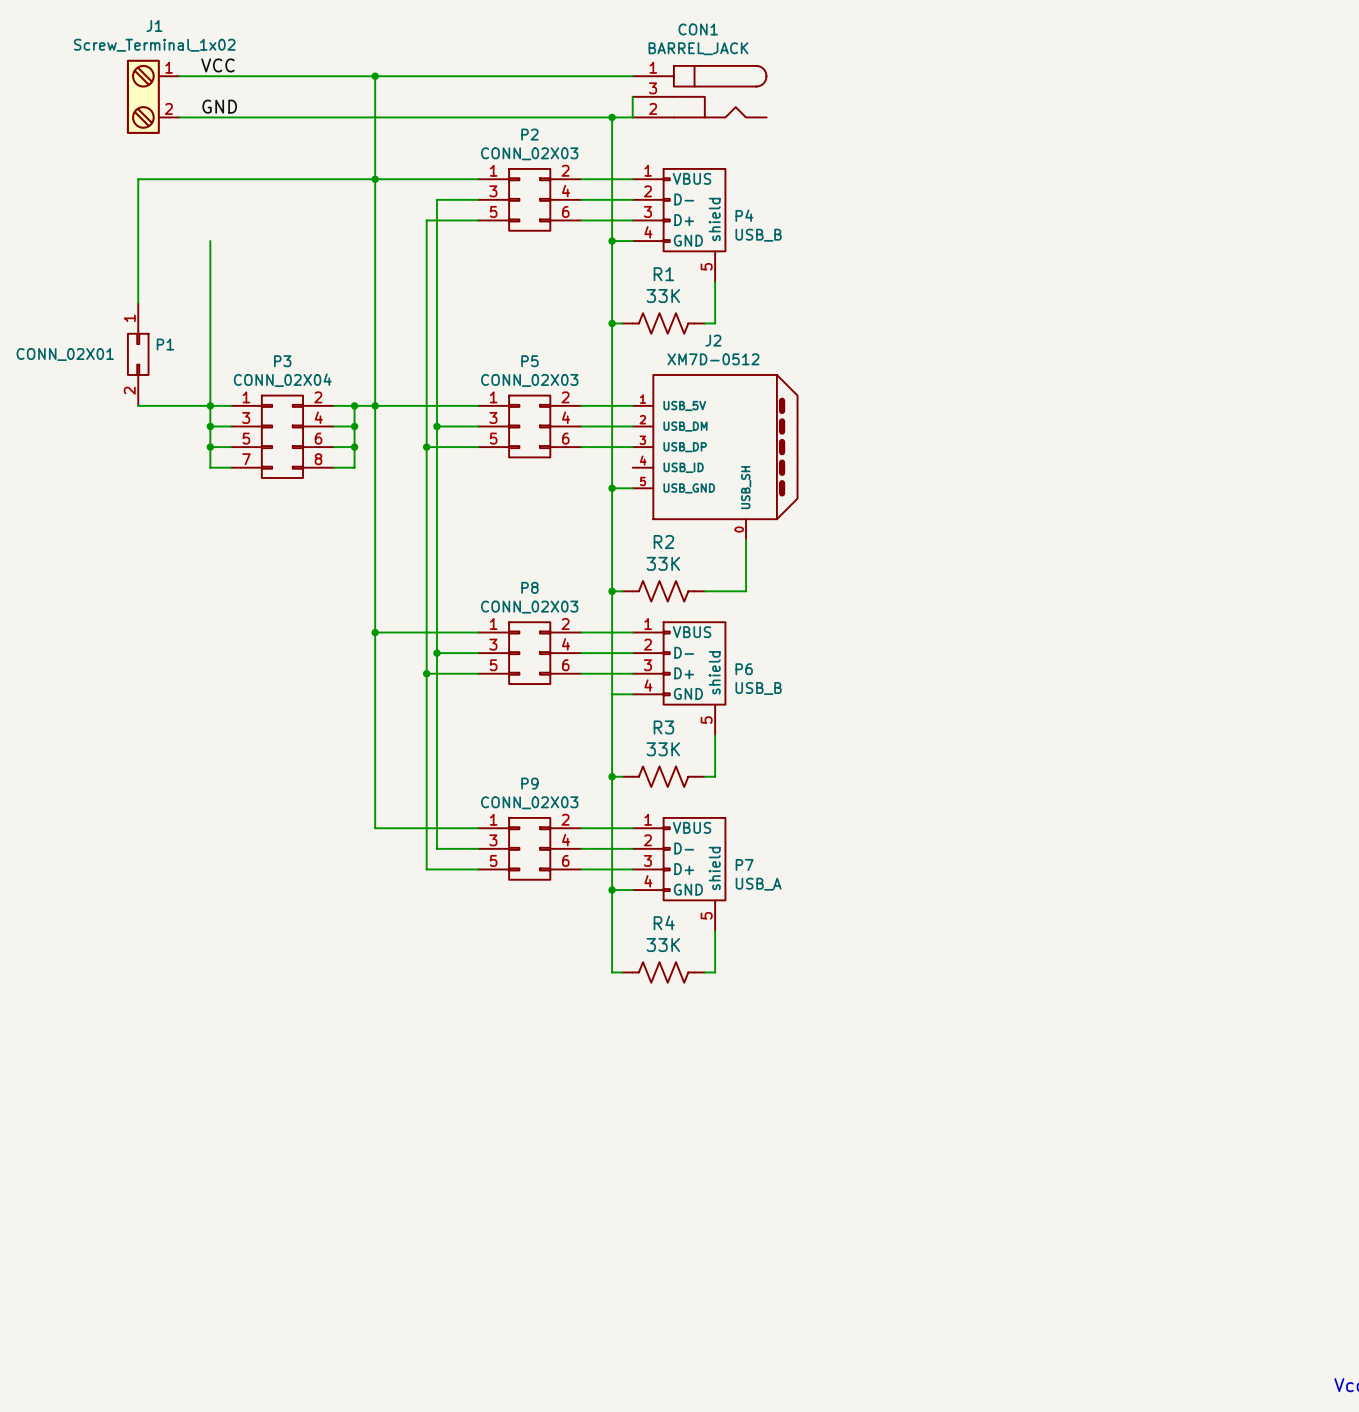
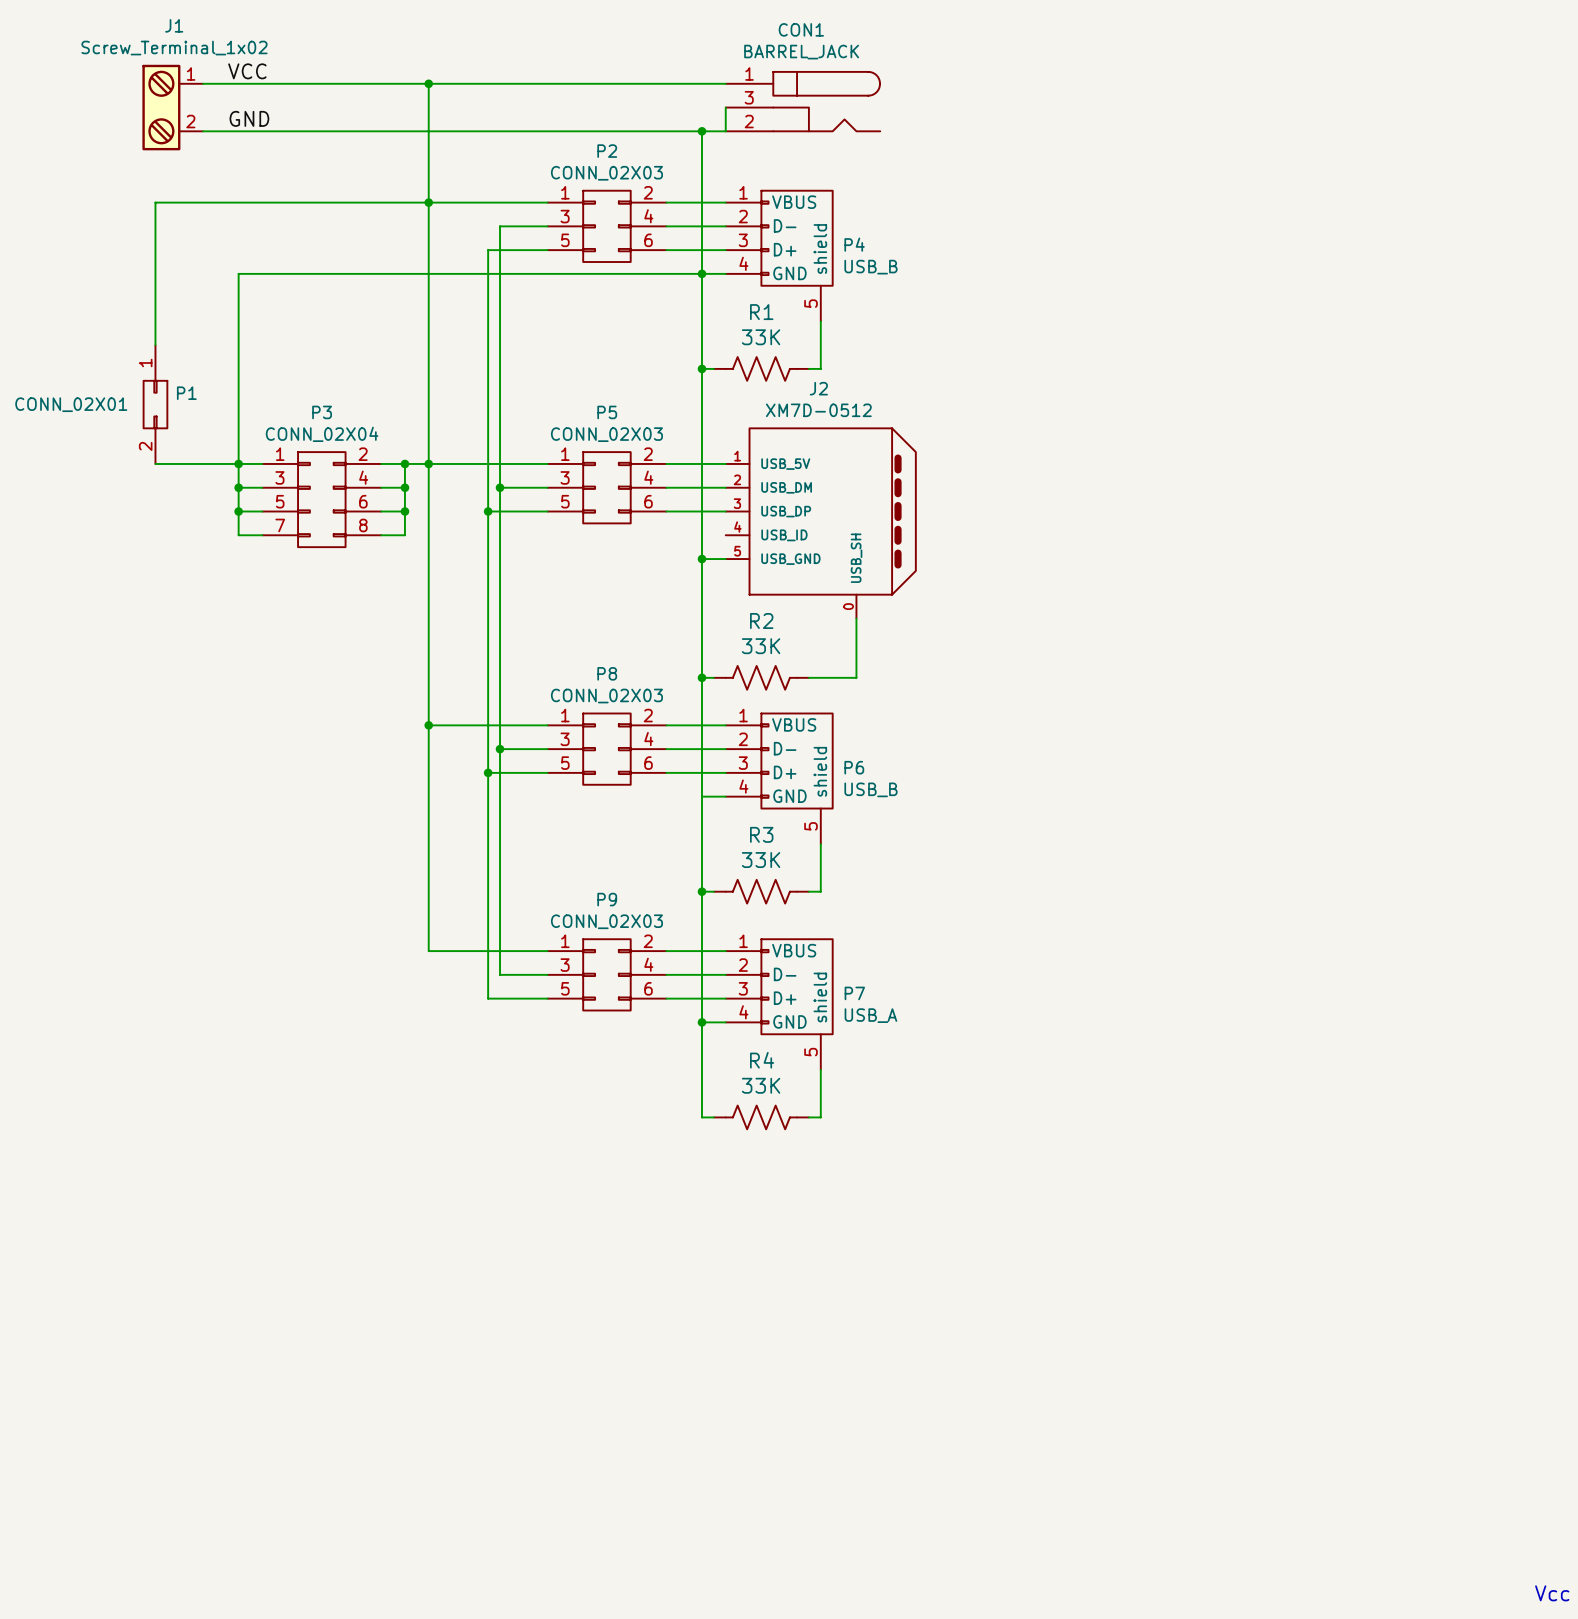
wire: none -> (238, 273) (701, 273)

